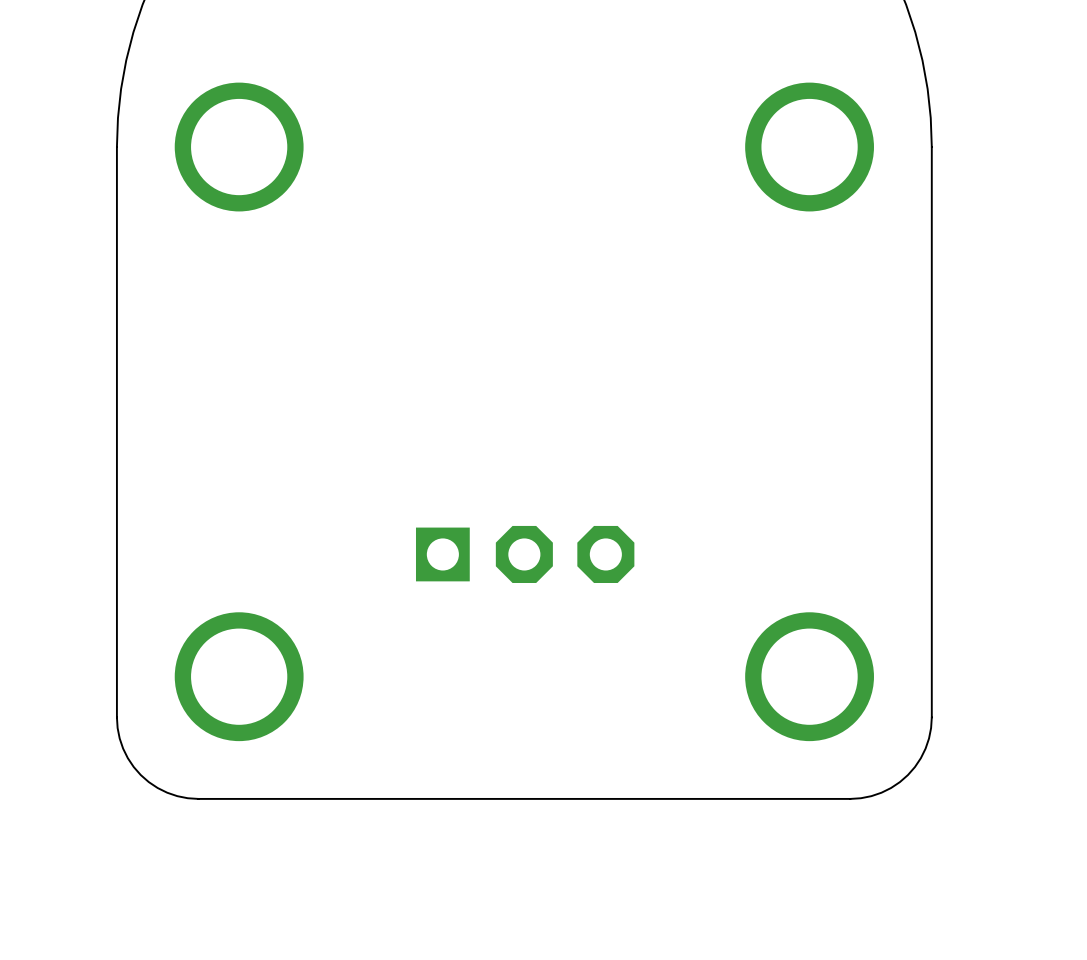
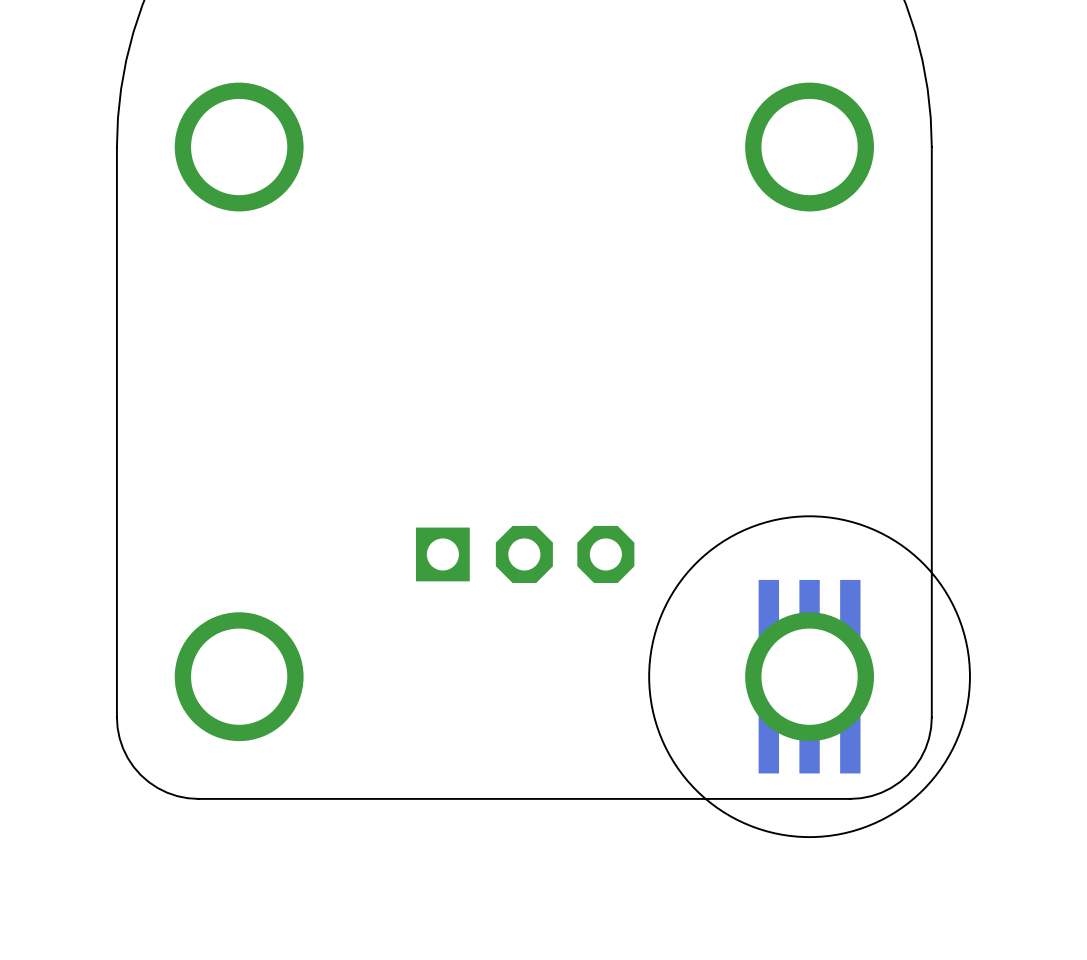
part: none -> (809, 676)

